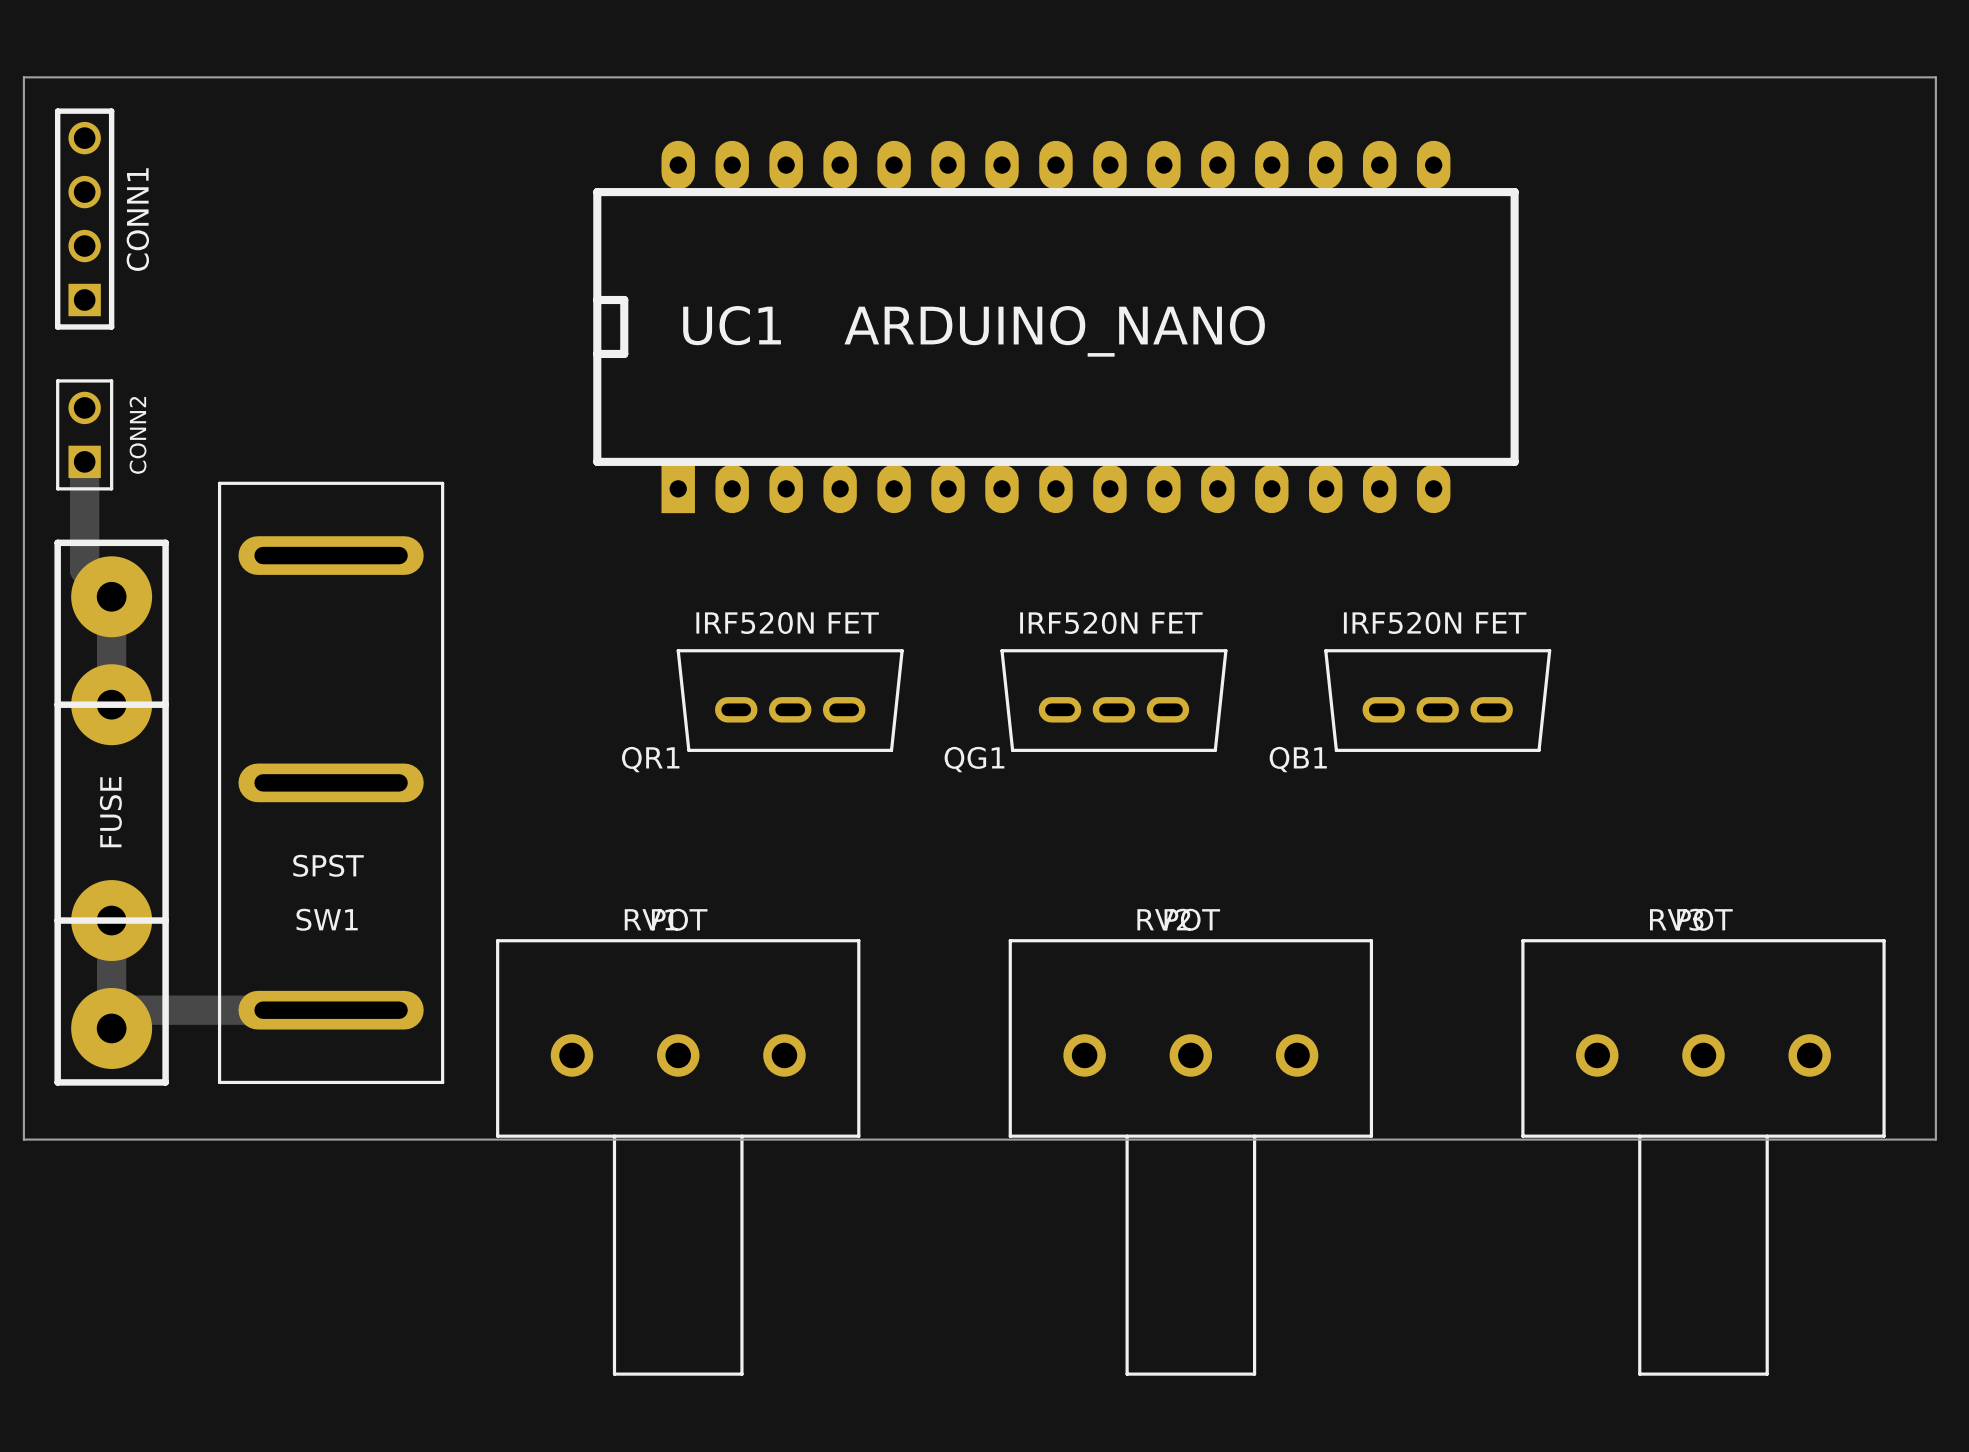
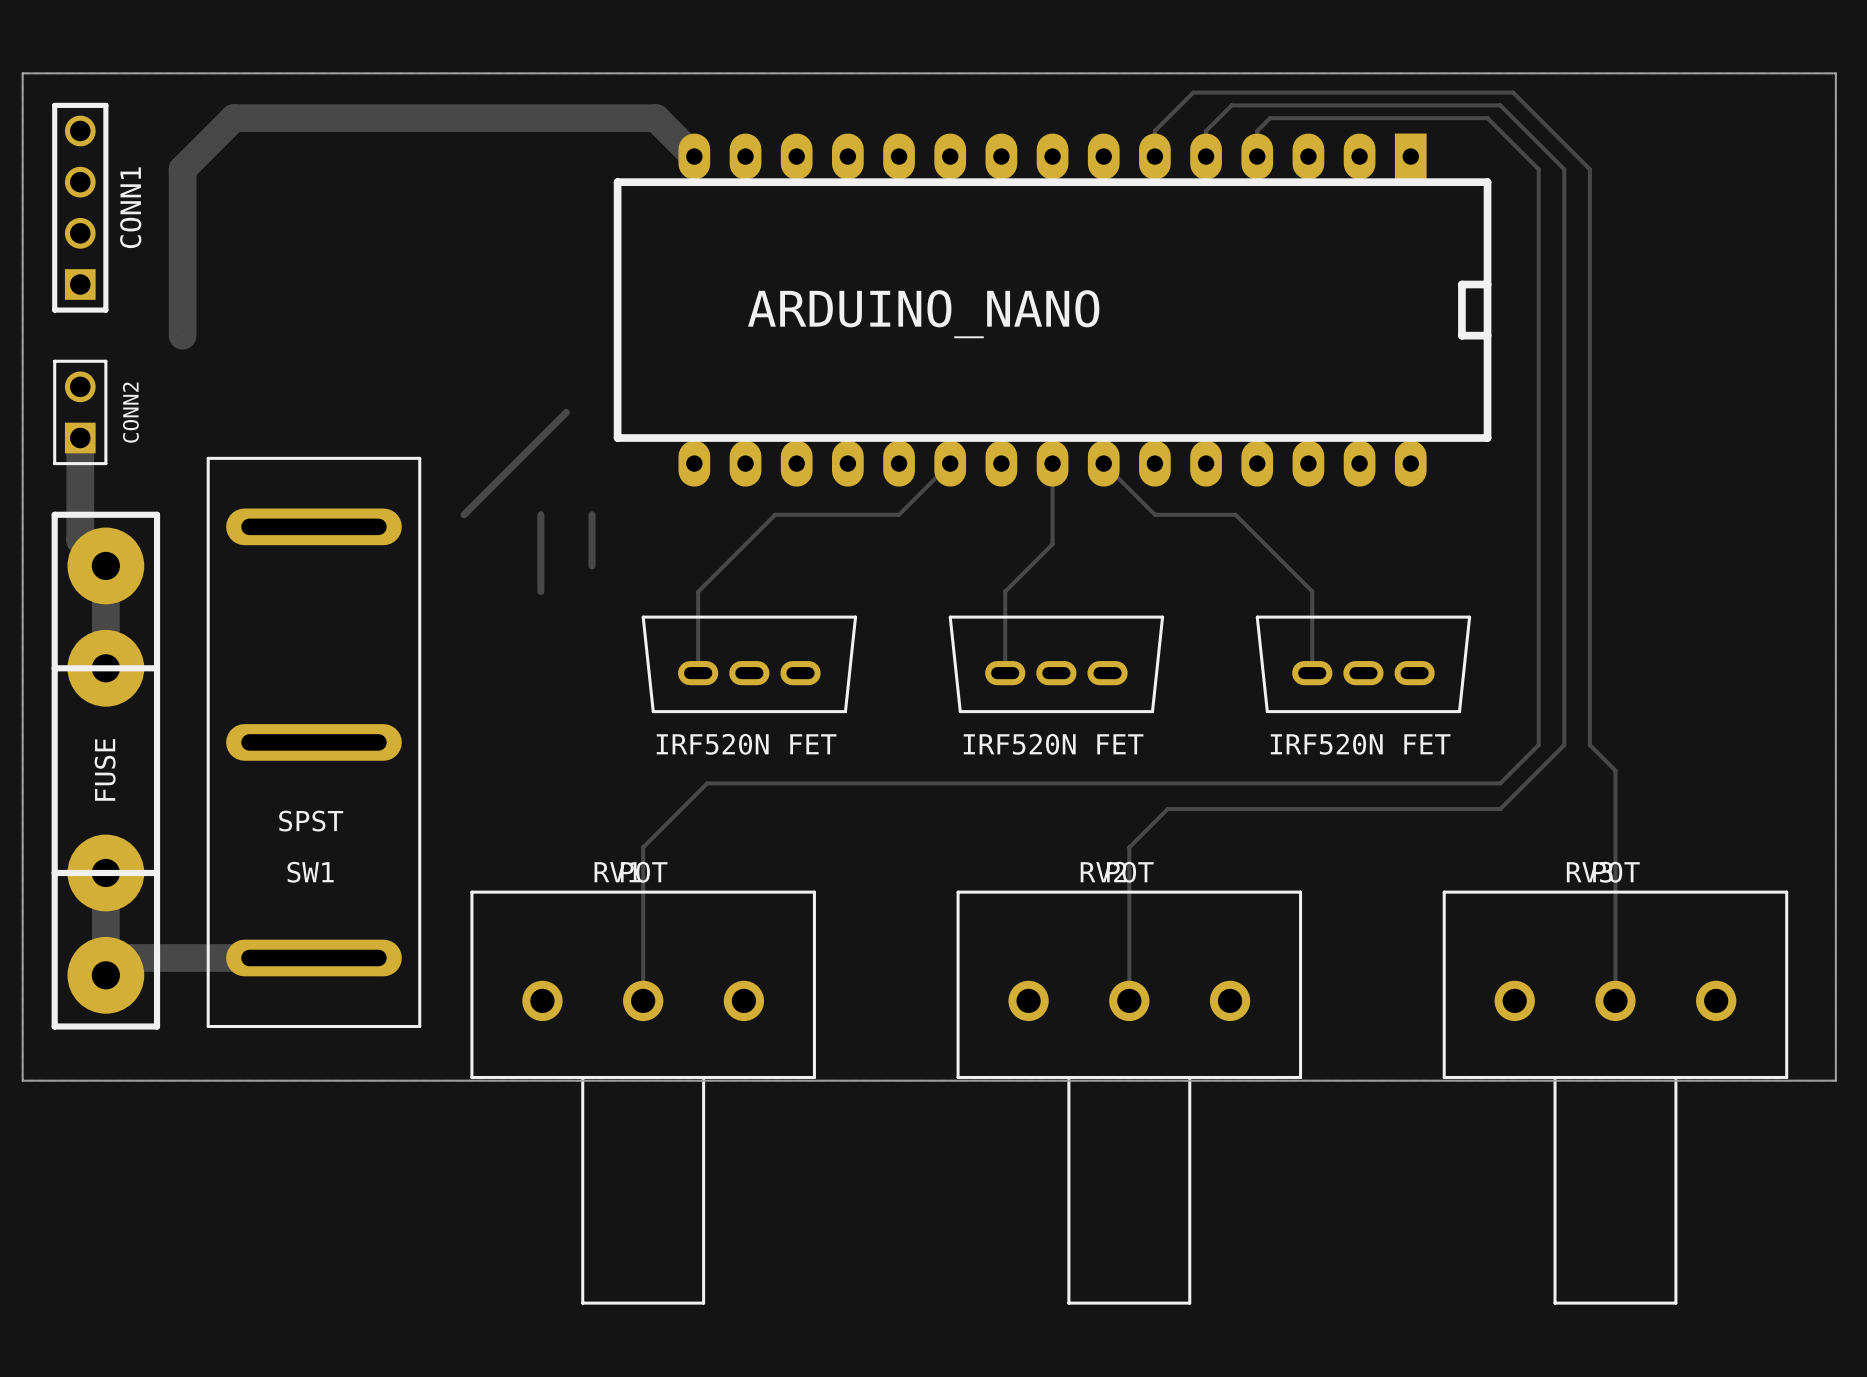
track: none -> (694, 156) (655, 118) (233, 118) (182, 169) (182, 335)
track: none -> (1154, 156) (1154, 130) (1193, 92) (1513, 92) (1589, 169) (1589, 745) (1615, 770) (1615, 1000)
track: none -> (1206, 156) (1206, 130) (1231, 105) (1500, 105) (1564, 169) (1564, 745) (1500, 809) (1167, 809) (1129, 847) (1129, 1000)
track: none -> (1257, 156) (1257, 130) (1270, 118) (1487, 118) (1538, 169) (1538, 745) (1500, 783) (707, 783) (643, 847) (643, 1000)
UC1: ARDUINO_NANO (1055, 326) -> none
part: none -> ARDUINO_NANO (1052, 310)
track: none -> (566, 412) (464, 514)
track: none -> (950, 463) (899, 514) (775, 514) (698, 591) (698, 673)
track: none -> (1052, 463) (1052, 544) (1005, 591) (1005, 673)
track: none -> (1103, 463) (1154, 514) (1235, 514) (1312, 591) (1312, 673)
track: none -> (540, 514) (540, 591)
track: none -> (592, 514) (592, 565)
QR1 value position: IRF520N FET (787, 622) -> IRF520N FET (746, 744)
QG1 value position: IRF520N FET (1111, 622) -> IRF520N FET (1053, 744)
QB1 value position: IRF520N FET (1435, 622) -> IRF520N FET (1360, 744)
QR1 name: QR1 (650, 759) -> none
QG1 name: QG1 (974, 759) -> none
QB1 name: QB1 (1298, 759) -> none

